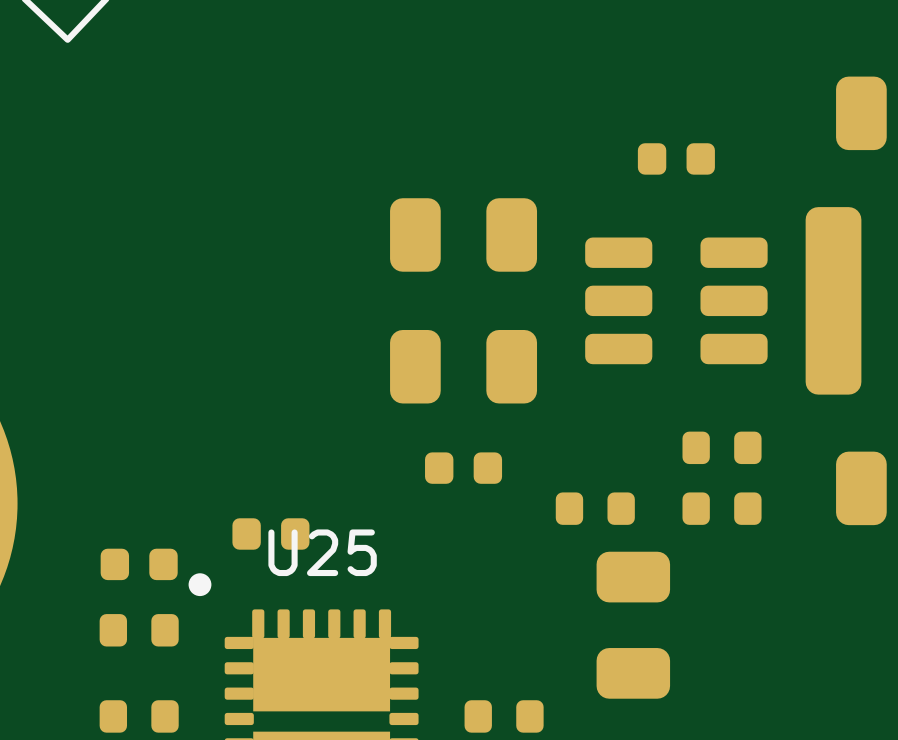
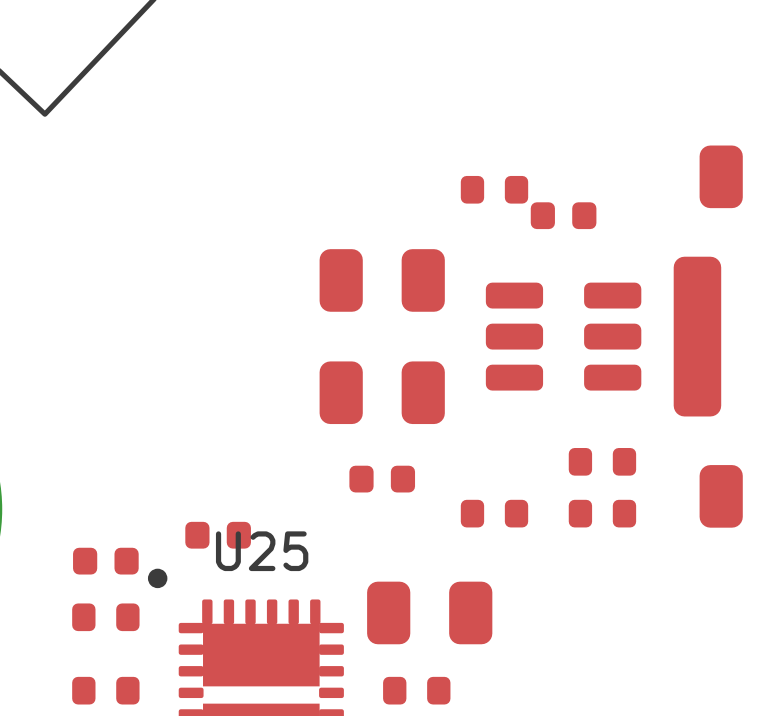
part: none -> (494, 189)
part rotation: 0° (633, 625) -> 90° clockwise (429, 612)
part position: (633, 625) -> (429, 612)

